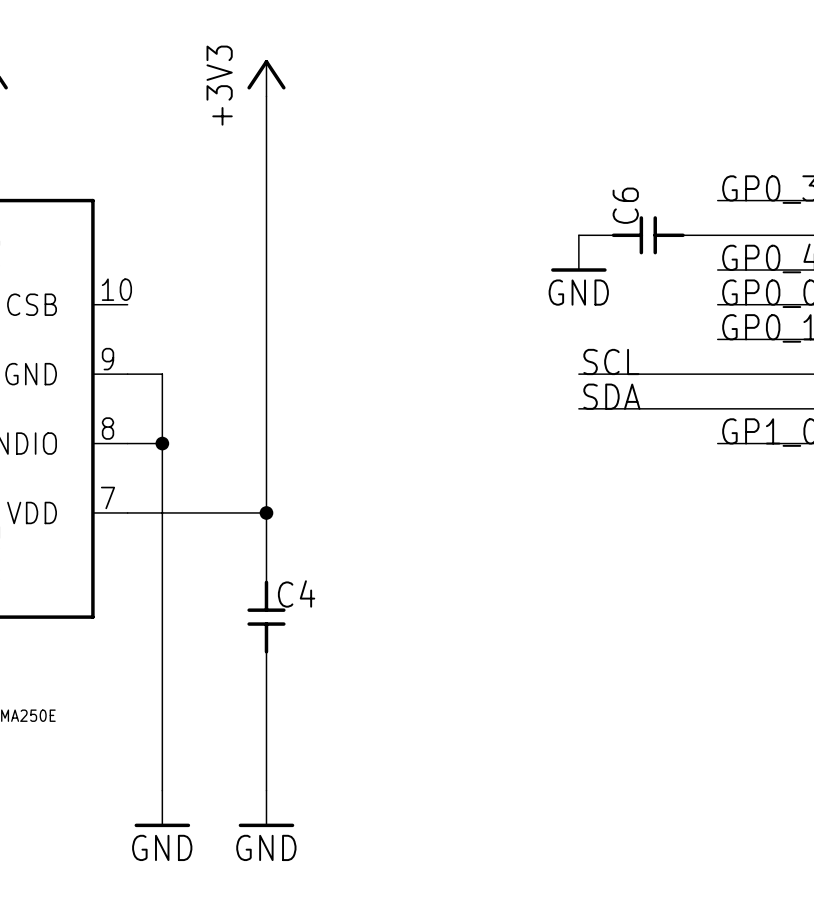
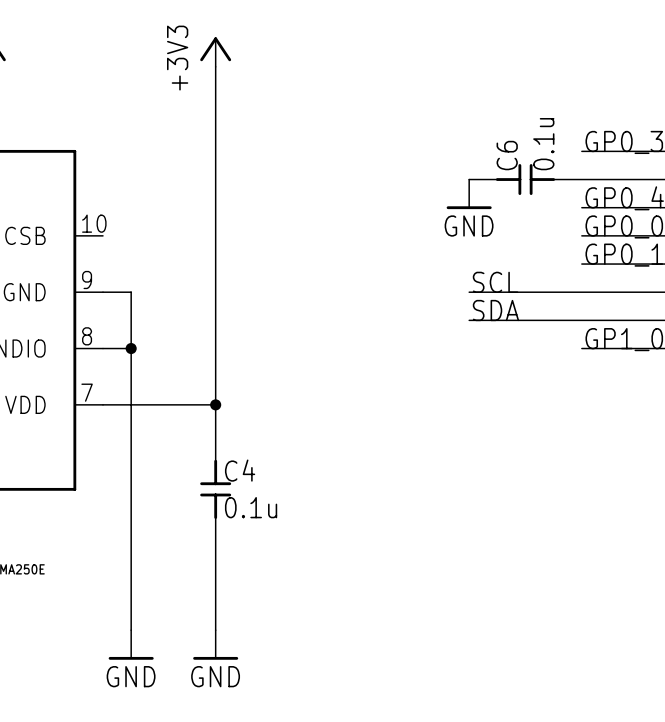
C6 value: none -> 0.1u (543, 144)
C4 value: none -> 0.1u (251, 507)

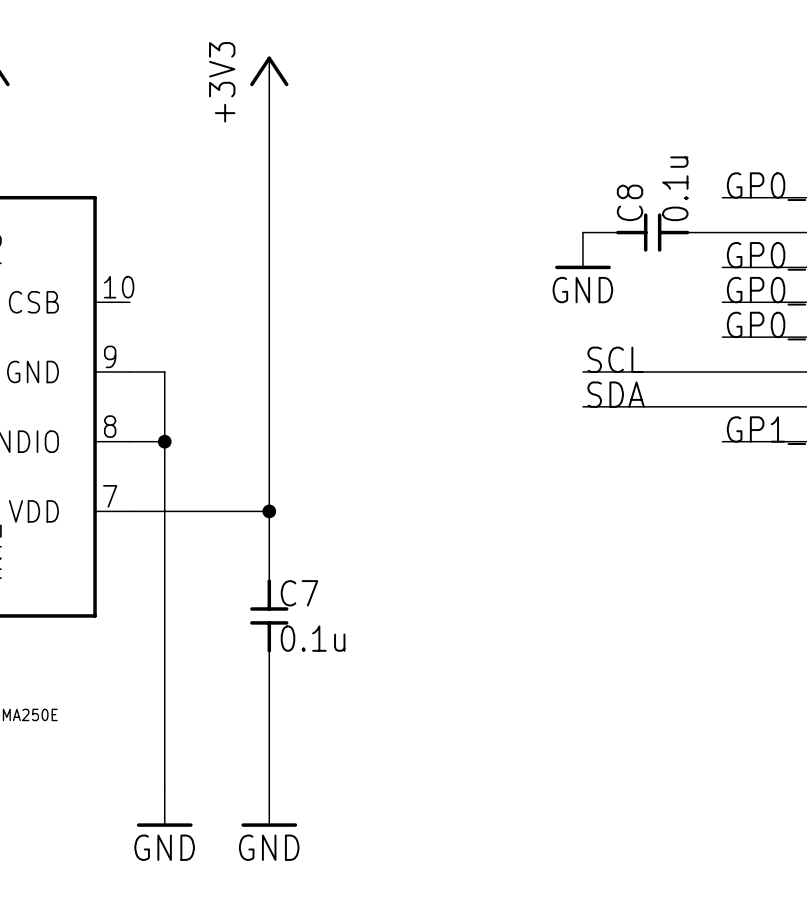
C6 name: C6 (507, 155) -> C8 (630, 202)
C4 name: C4 (240, 470) -> C7 (299, 593)

